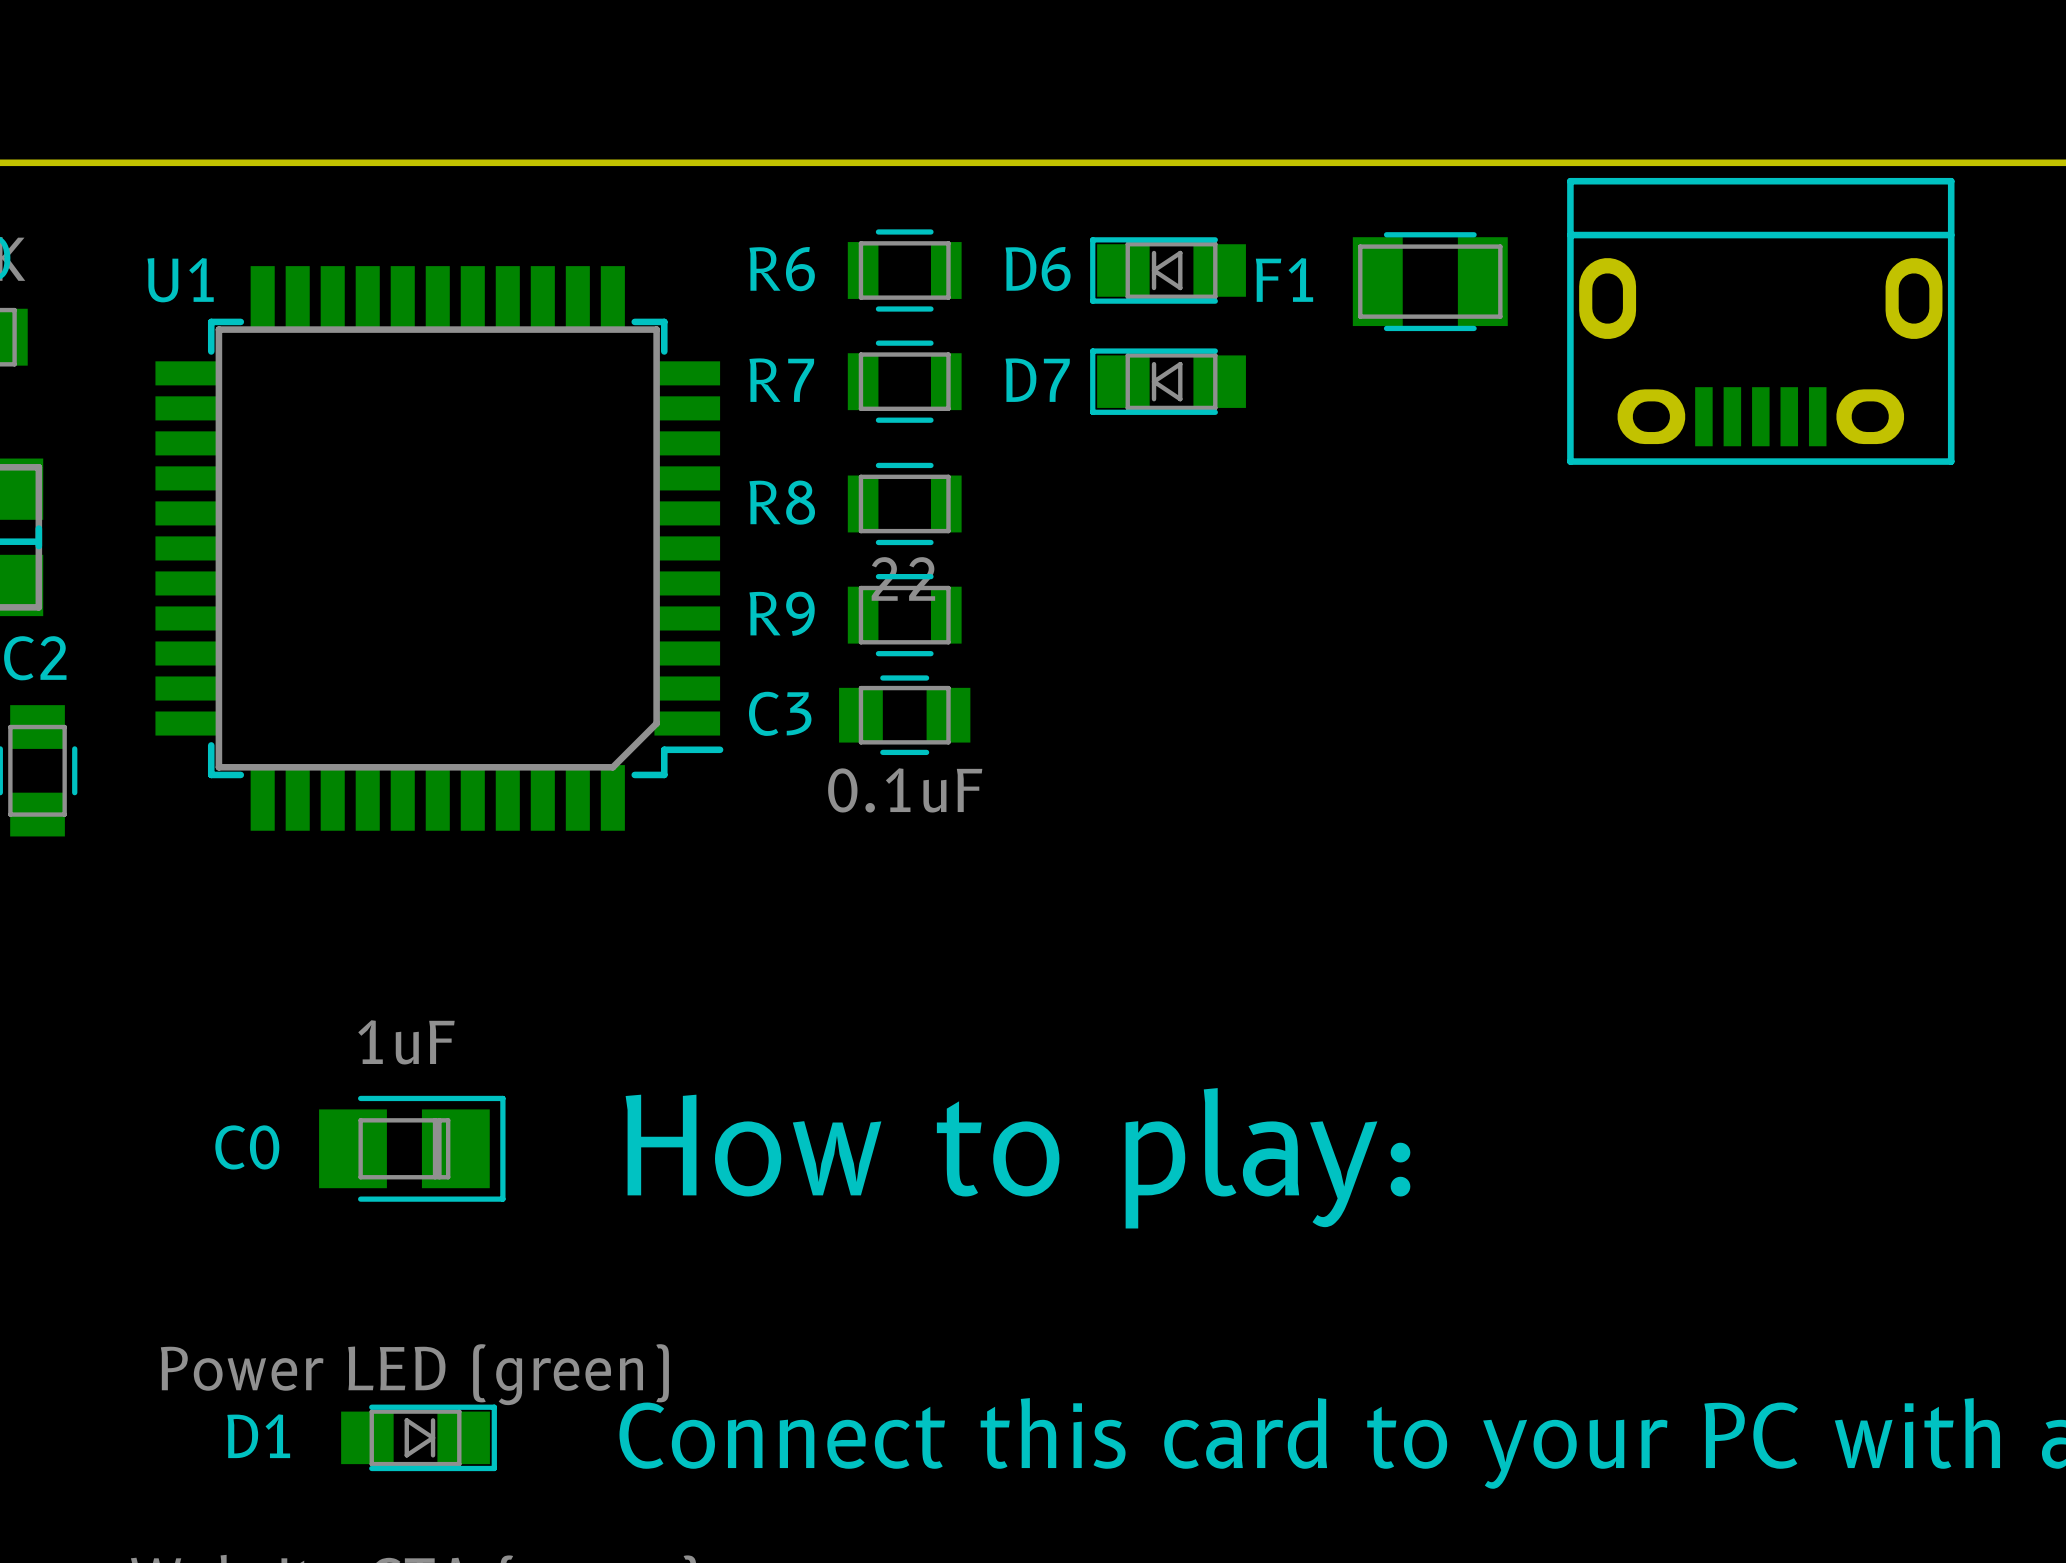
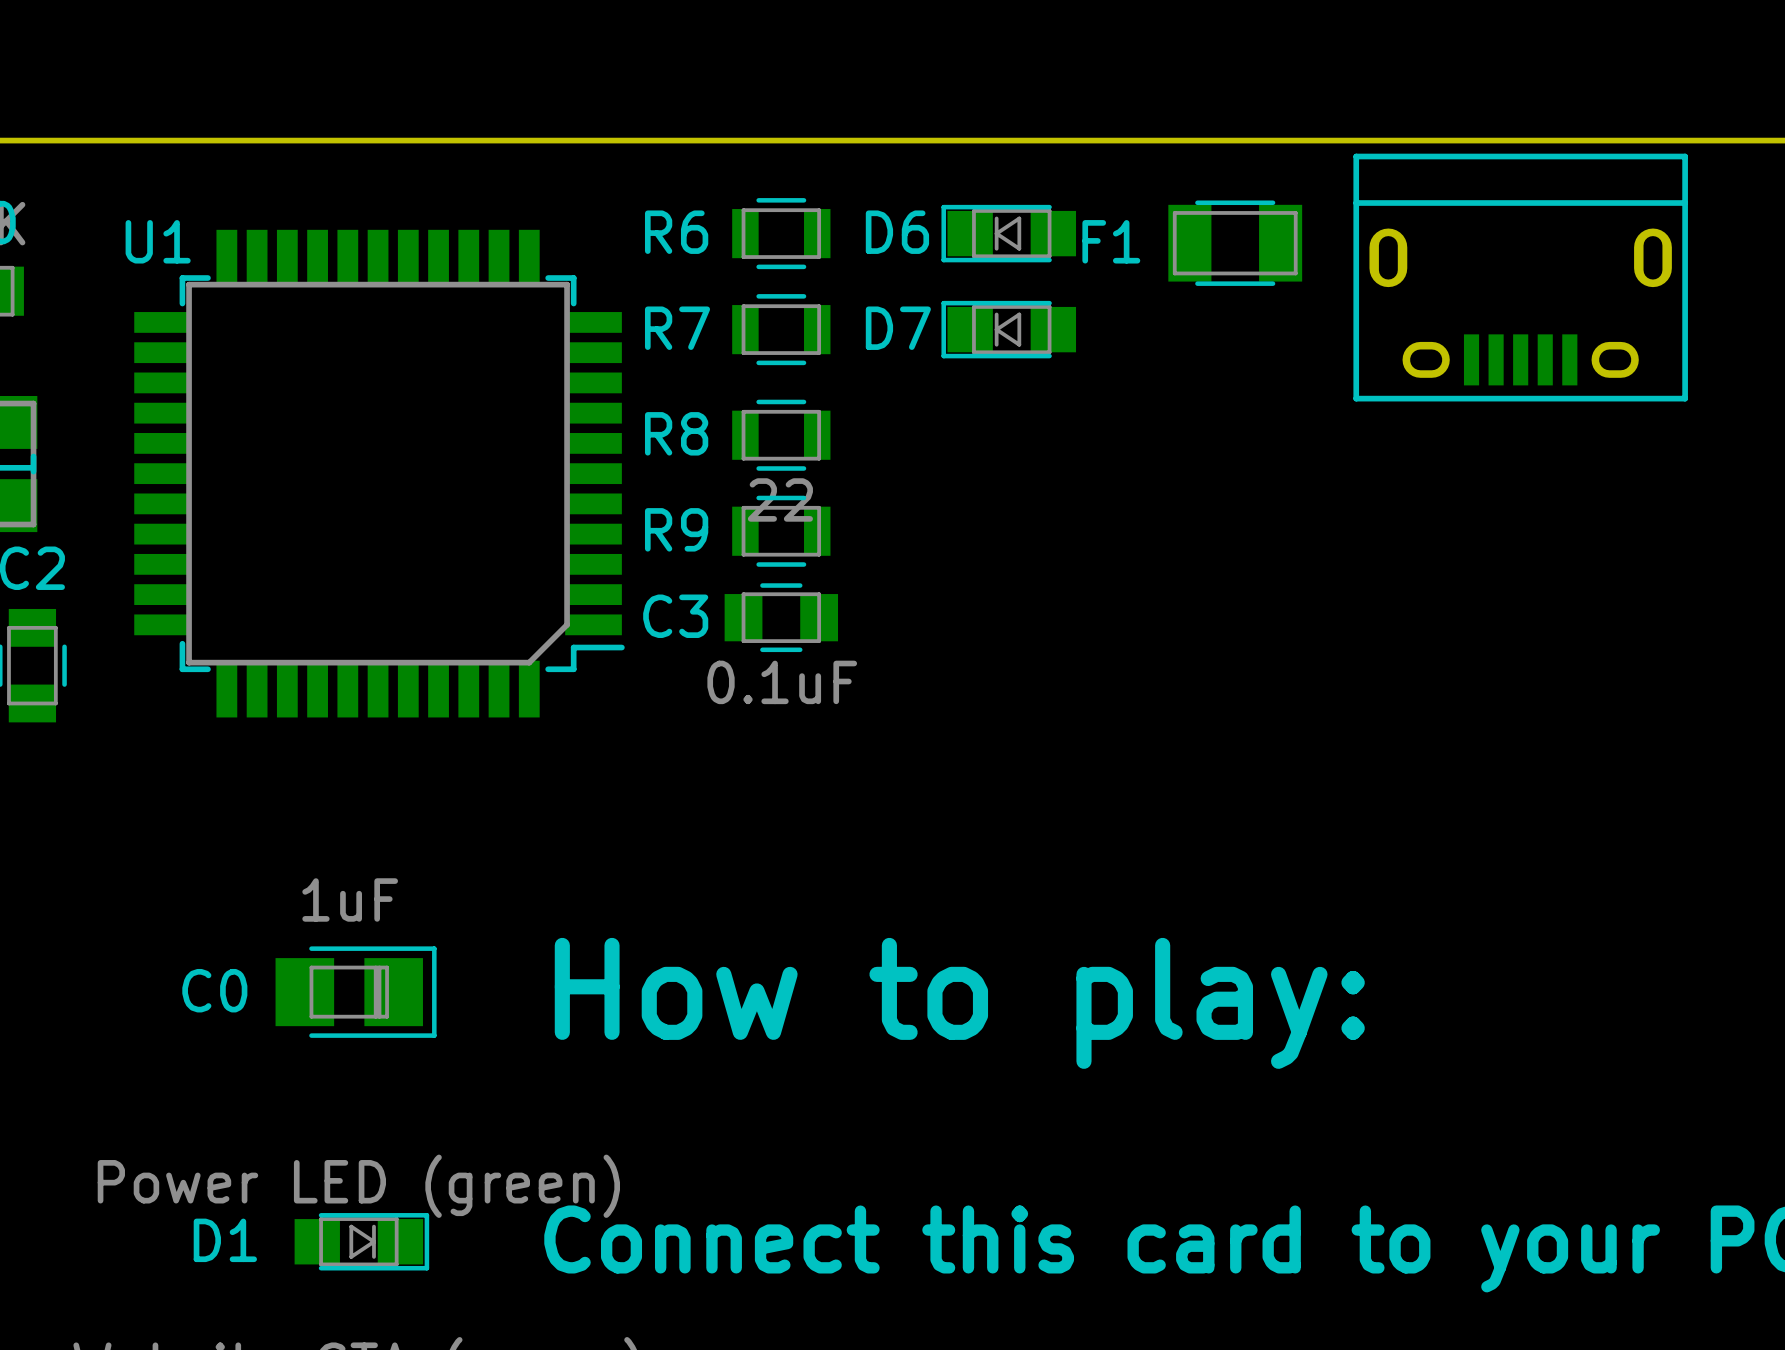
part footprint: [1567, 177, 1955, 465] -> [1353, 153, 1688, 402]

